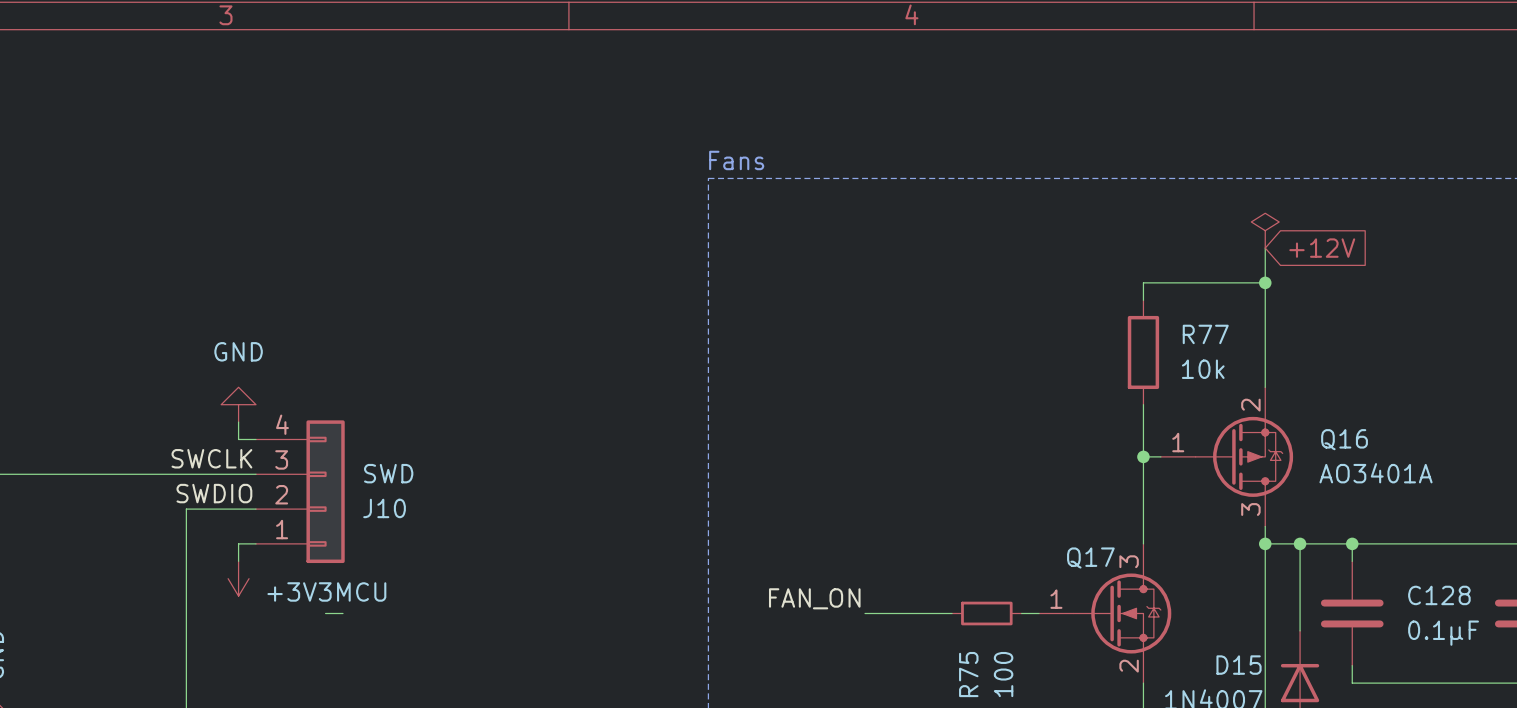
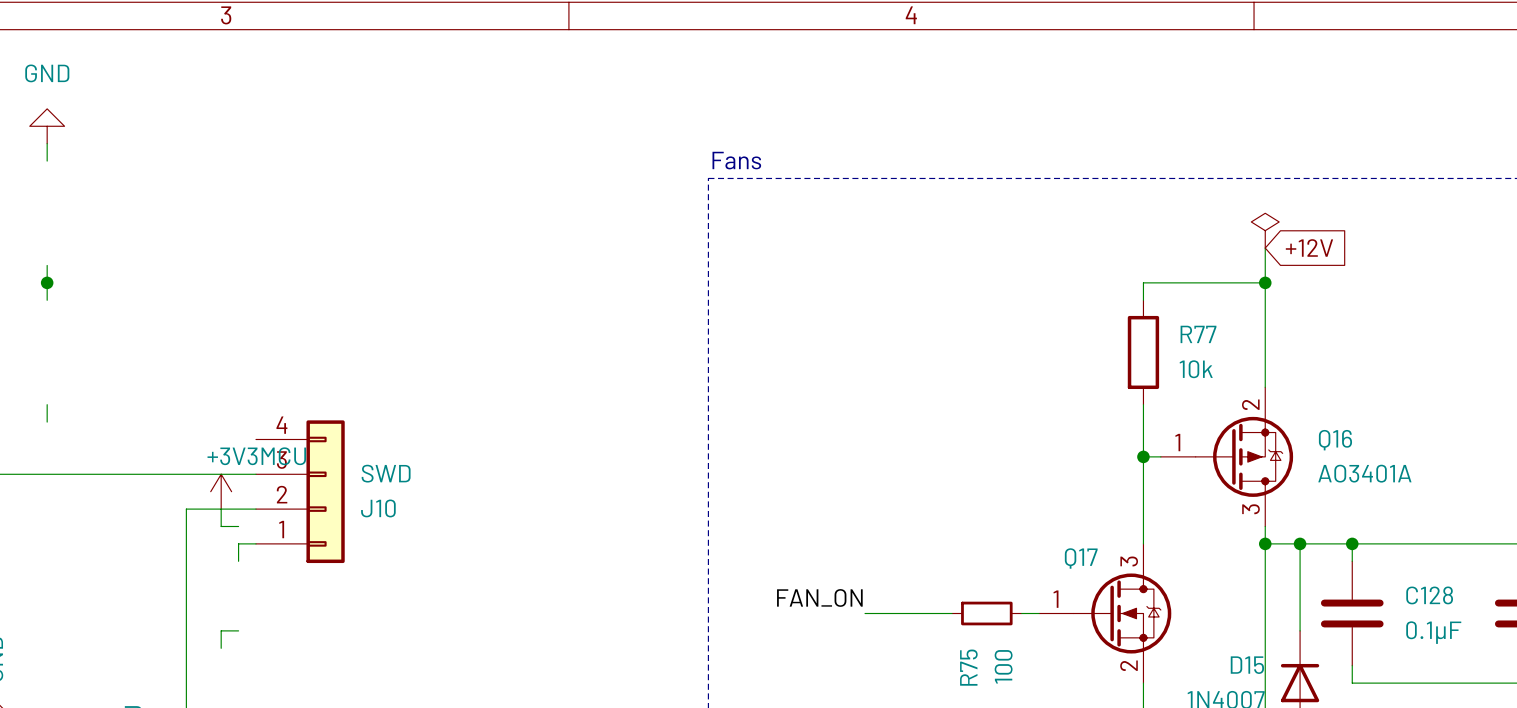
power symbol: none -> GND (47, 126)
wire: none -> (47, 143) (47, 161)
wire: none -> (47, 265) (47, 300)
junction: none -> (47, 282)
wire: none -> (47, 404) (47, 422)
power symbol: GND (238, 404) -> none
wire: (238, 422) (238, 439) (255, 439) -> (221, 509) (221, 526) (238, 526)
label: SWCLK (211, 458) -> none
label: SWDIO (214, 493) -> none
power symbol rotation: 0° (238, 578) -> 180° (221, 491)
power symbol position: +3V3MCU (238, 578) -> +3V3MCU (221, 491)
power symbol text position: +3V3MCU (326, 591) -> +3V3MCU (256, 456)
wire: (325, 613) (342, 613) -> none
wire: none -> (238, 630) (221, 630) (221, 648)

